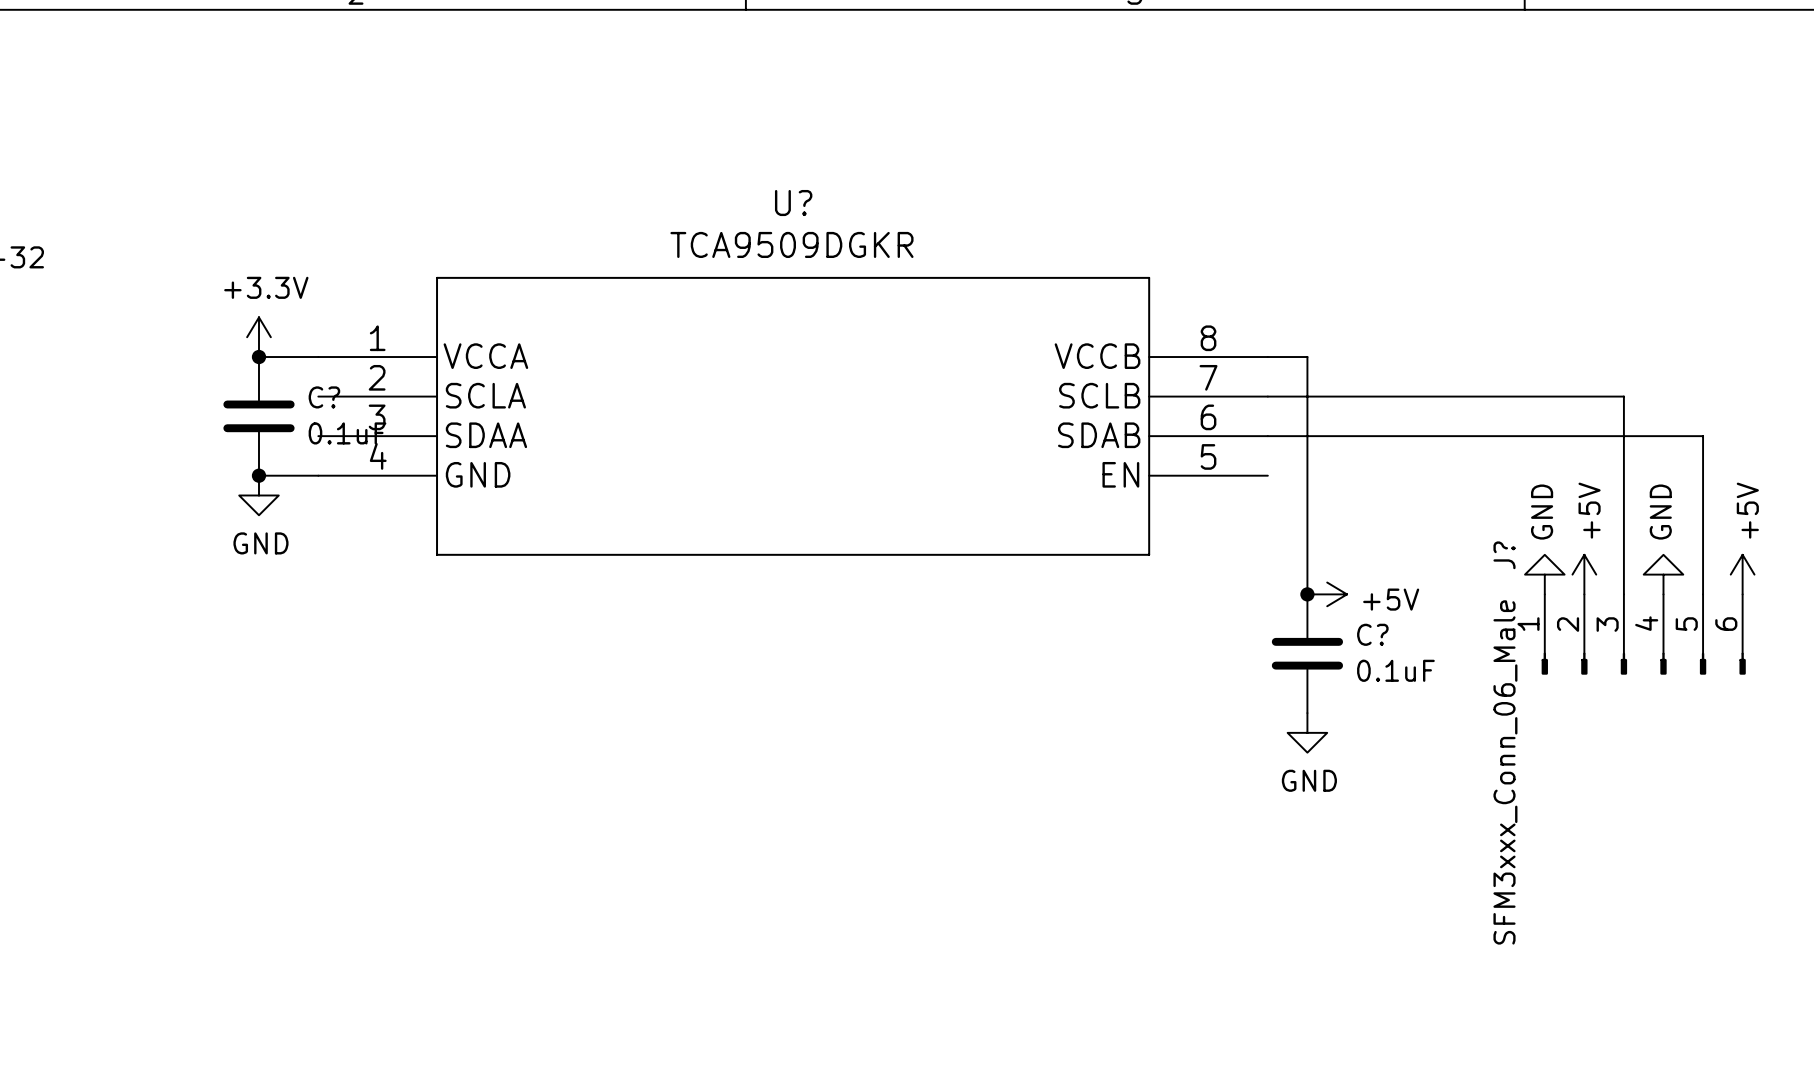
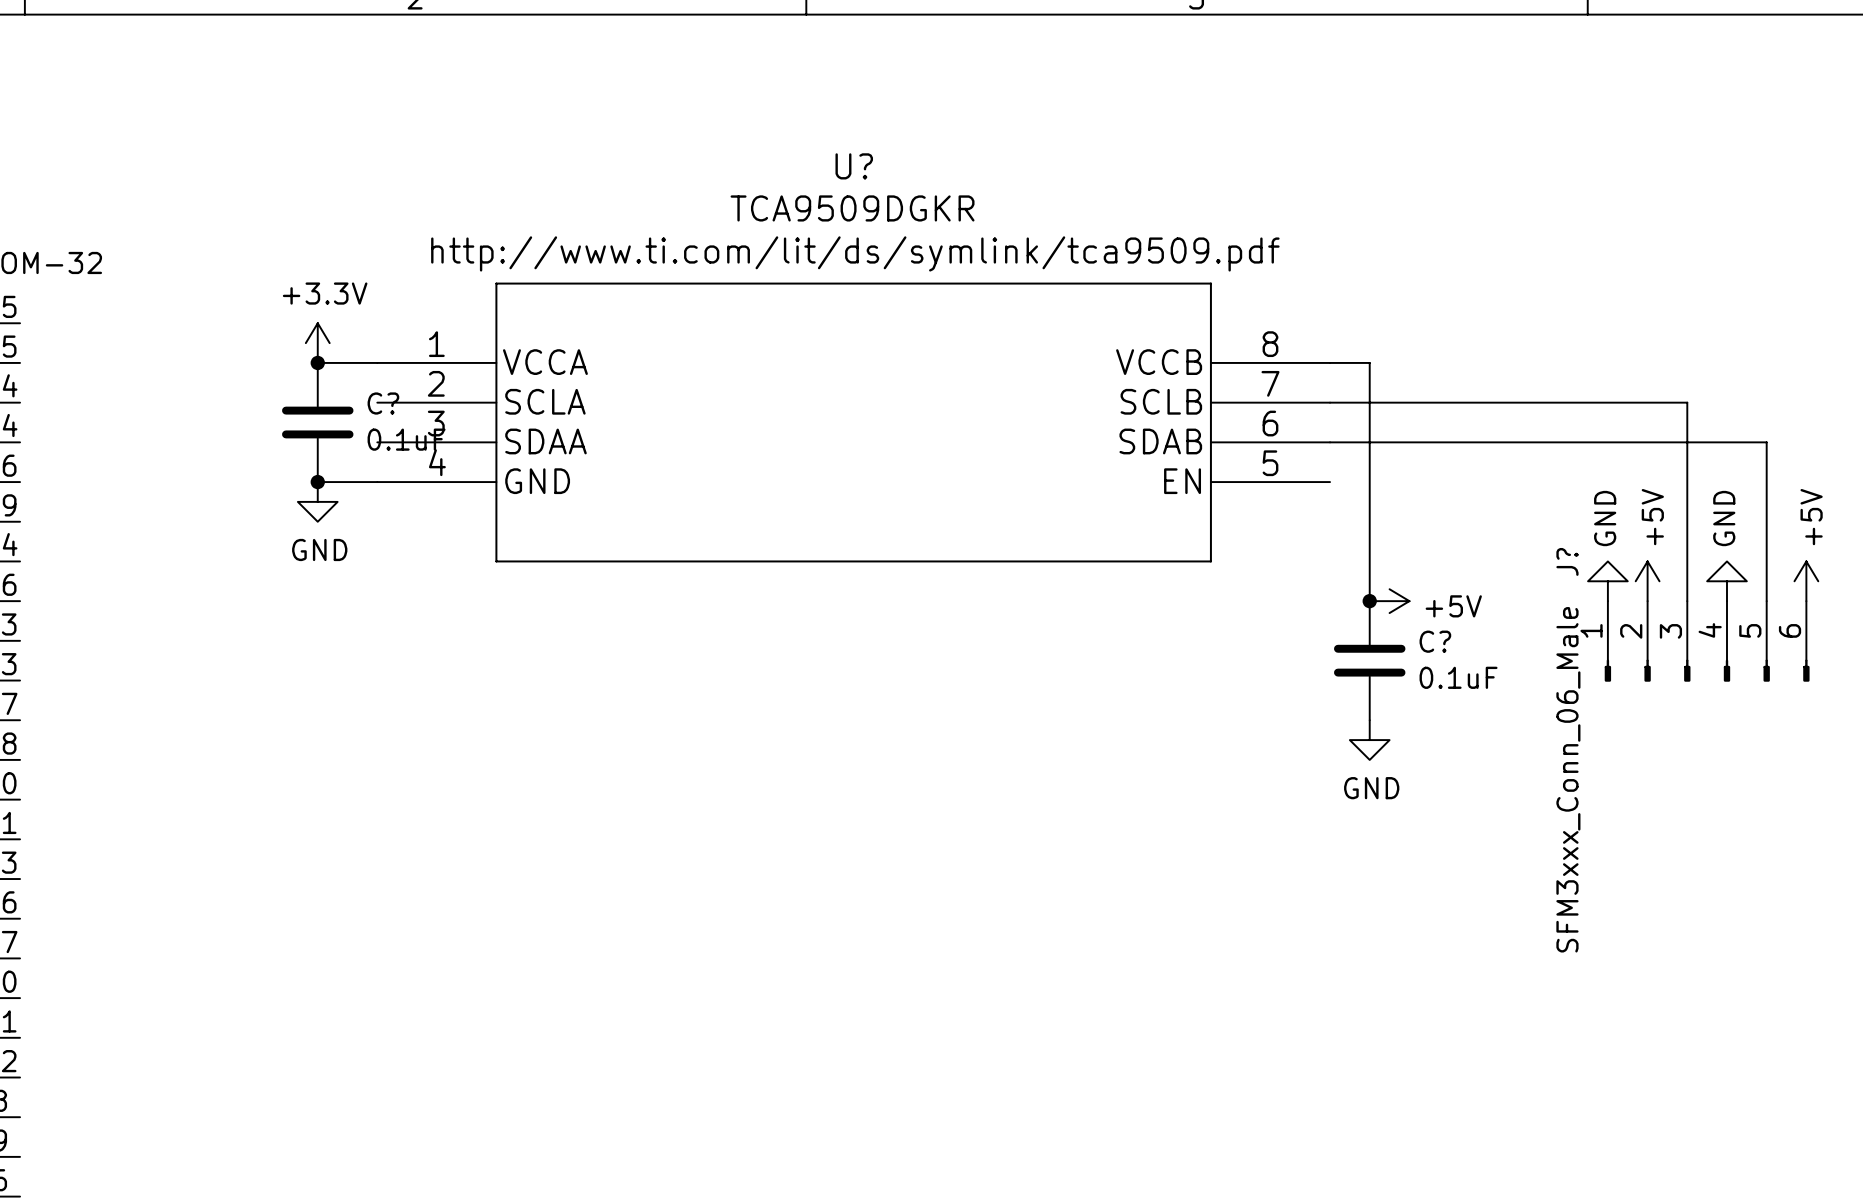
U? name position: U? (793, 203) -> U? (854, 166)
U? value position: TCA9509DGKR (791, 244) -> TCA9509DGKR (852, 208)
U? text: none -> http://www.ti.com/lit/ds/symlink/tca9509.pdf (855, 253)

